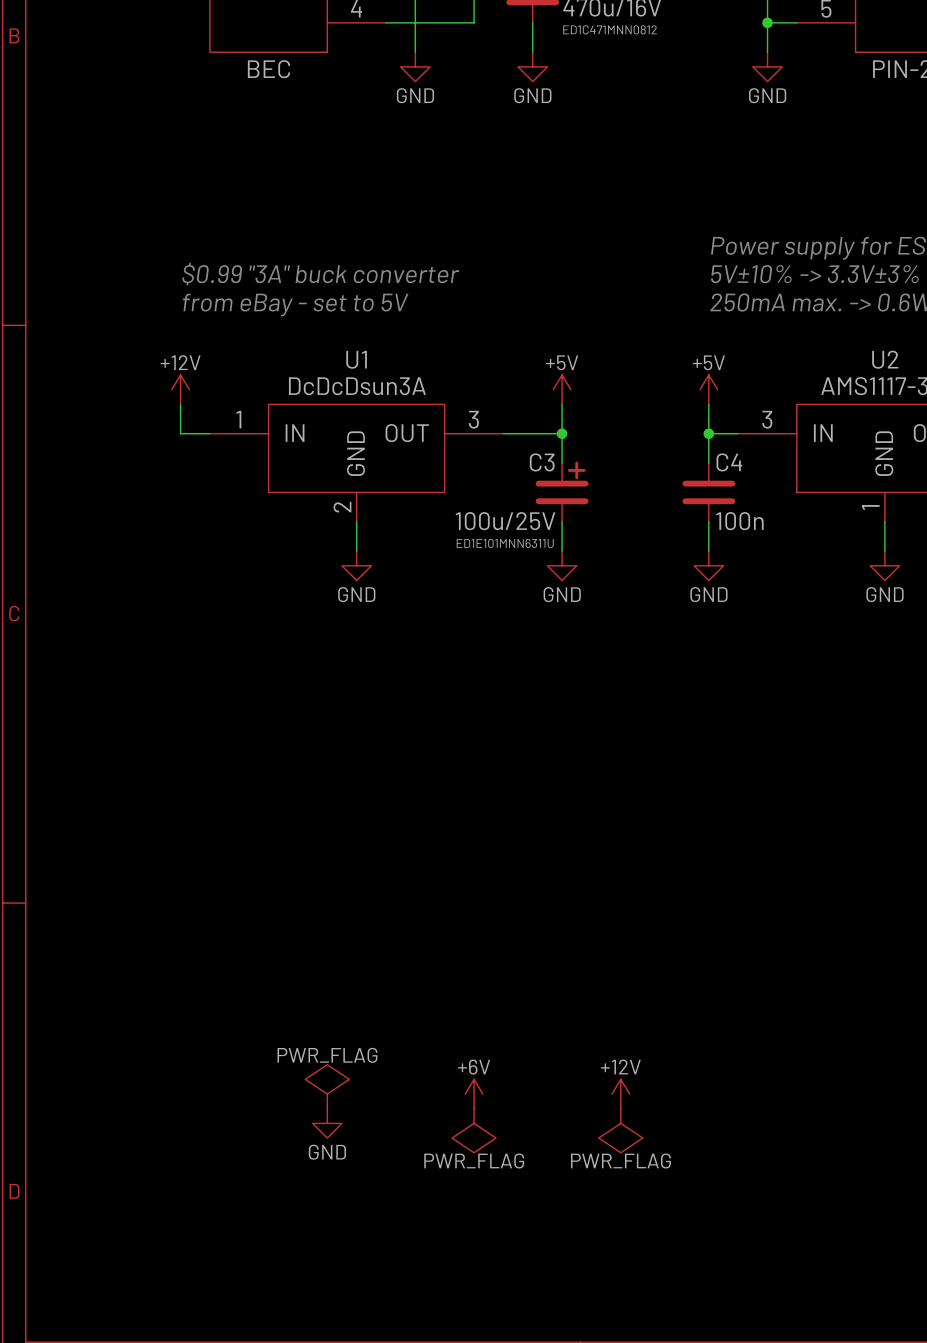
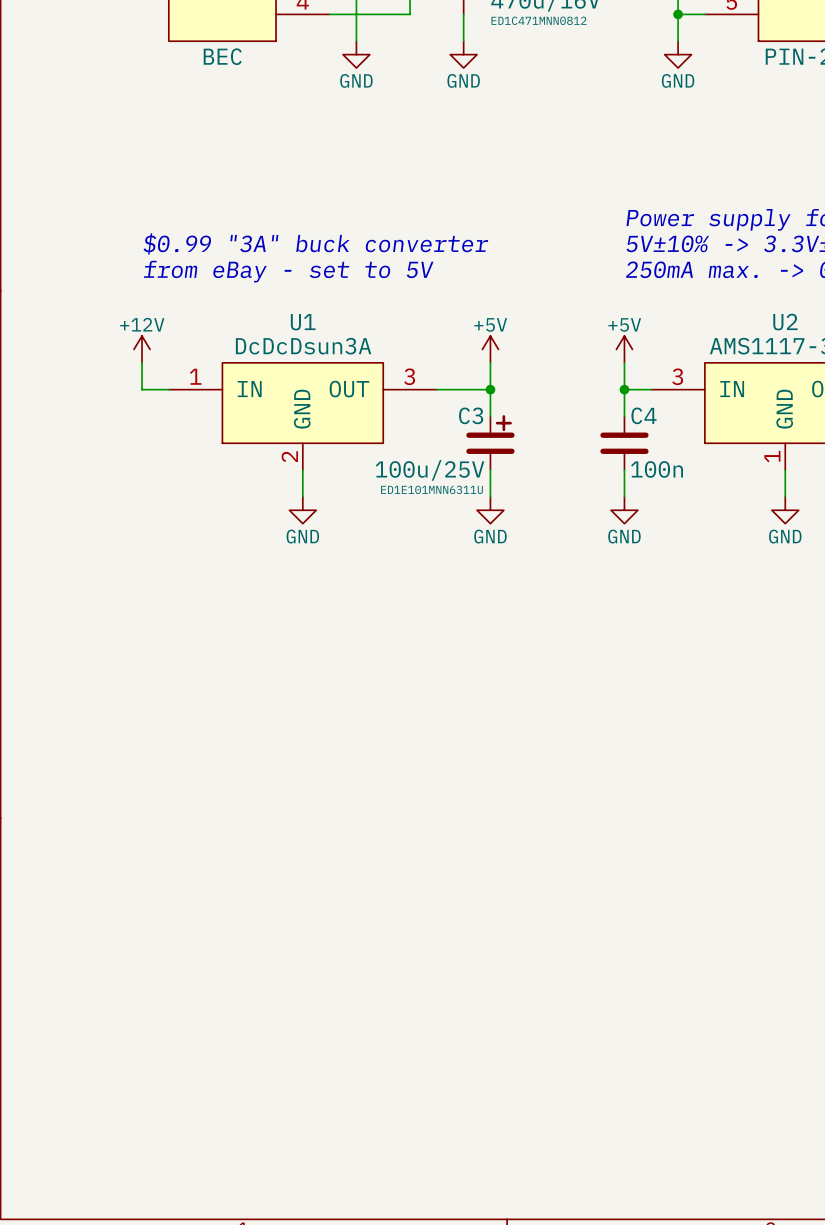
power symbol: PWR_FLAG (327, 1086) -> none
power symbol: +6V (474, 1094) -> none
power symbol: +12V (620, 1094) -> none
power symbol: GND (327, 1123) -> none
power symbol: PWR_FLAG (474, 1130) -> none
power symbol: PWR_FLAG (620, 1130) -> none

